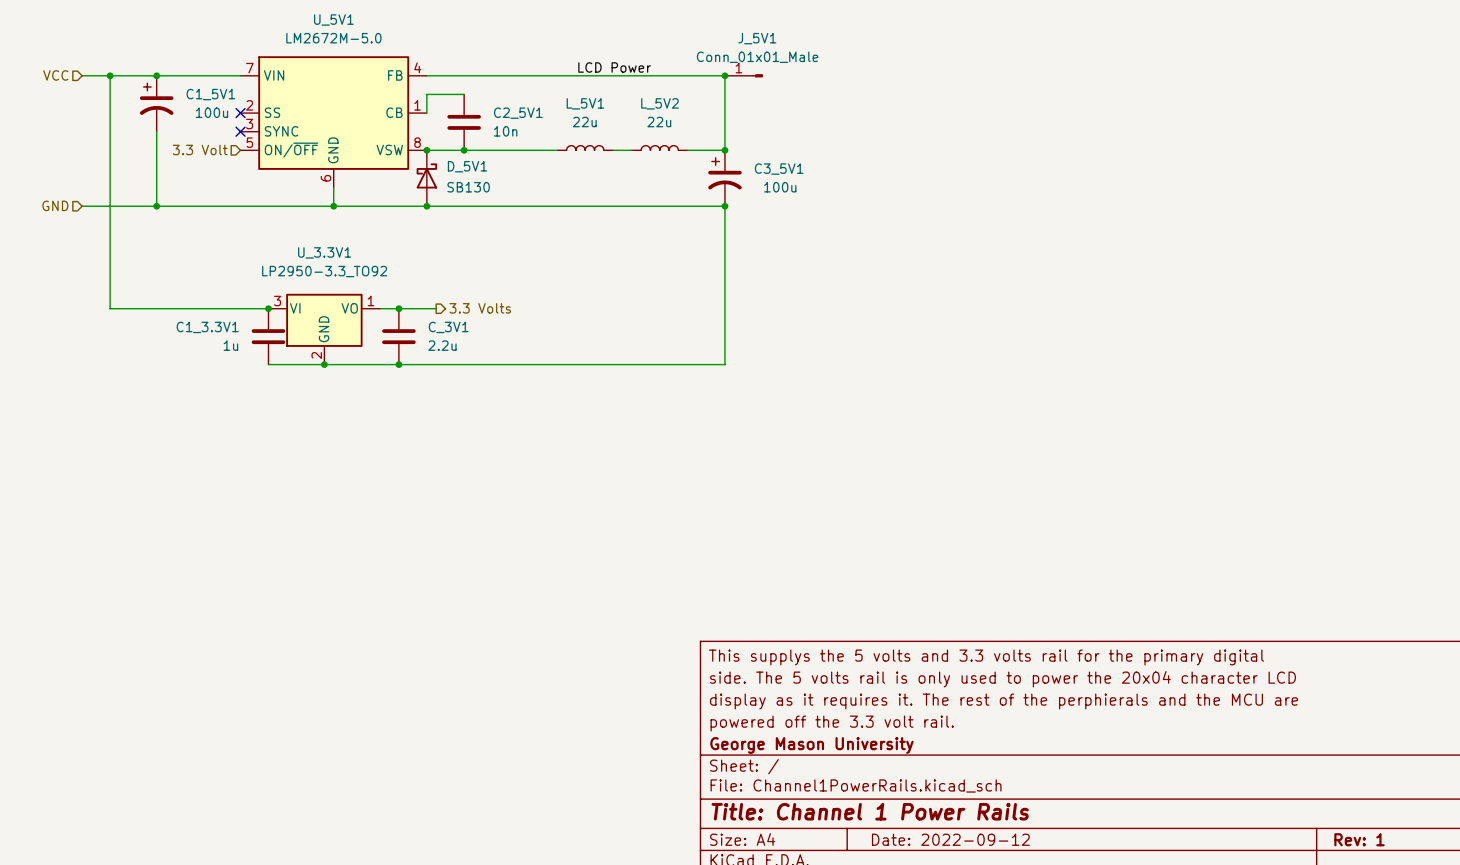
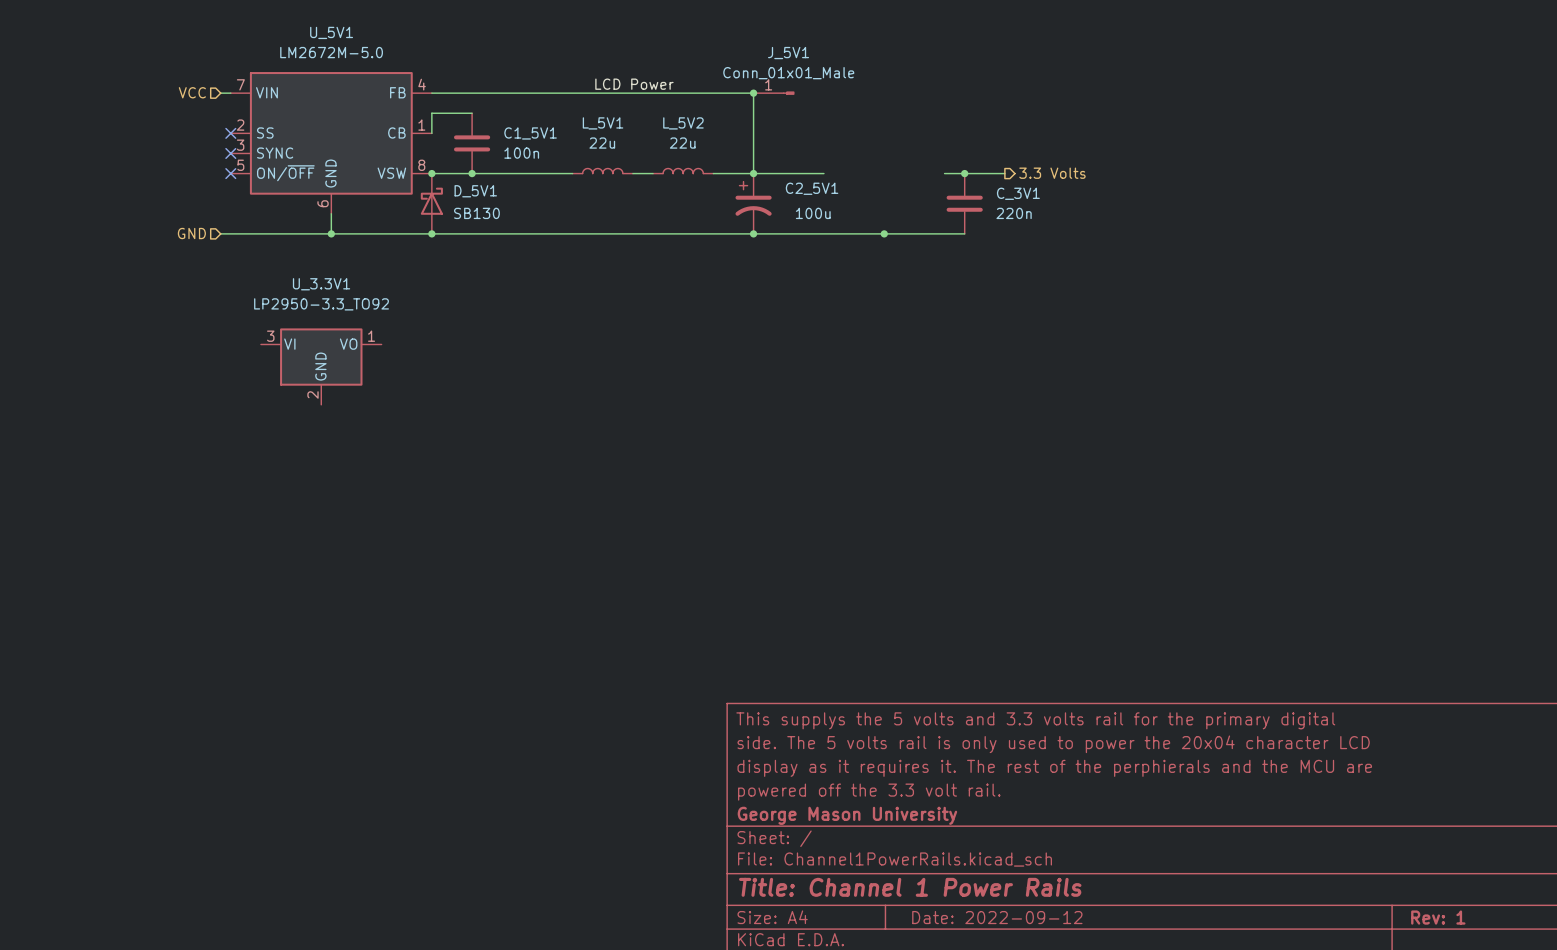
hierarchical label position: VCC (55, 75) -> VCC (192, 92)
wire: (82, 75) (231, 75) -> none
wire: (110, 75) (110, 308) (268, 308) -> none
junction: (110, 75) -> none
junction: (156, 75) -> none
C1_5V1: 100u (156, 103) -> none
C2_5V1 name: C2_5V1 (518, 113) -> C1_5V1 (530, 133)
wire: (156, 131) (156, 206) -> none
C2_5V1 value: 10n (505, 131) -> 100n (521, 153)
hierarchical label: 3.3 Volt (200, 149) -> none
hierarchical label: none -> 3.3 Volts (1052, 173)
no-connect mark: none -> (230, 173)
wire: none -> (753, 173) (823, 173)
wire: none -> (944, 173) (1004, 173)
junction: none -> (964, 173)
C3_5V1 name: C3_5V1 (779, 169) -> C2_5V1 (812, 188)
hierarchical label position: GND (55, 205) -> GND (191, 233)
wire: (82, 206) (231, 206) -> none
junction: (156, 206) -> none
wire: (724, 206) (724, 364) (268, 364) -> (753, 233) (964, 233)
junction: none -> (884, 233)
junction: (268, 308) -> none
wire: (380, 308) (436, 308) -> none
junction: (398, 308) -> none
hierarchical label: 3.3 Volts (480, 308) -> none
C1_3.3V1: 1u (268, 336) -> none
C_3V1 position: (398, 336) -> (964, 203)
C_3V1 value: 2.2u (442, 345) -> 220n (1014, 213)
junction: (324, 364) -> none
junction: (398, 364) -> none

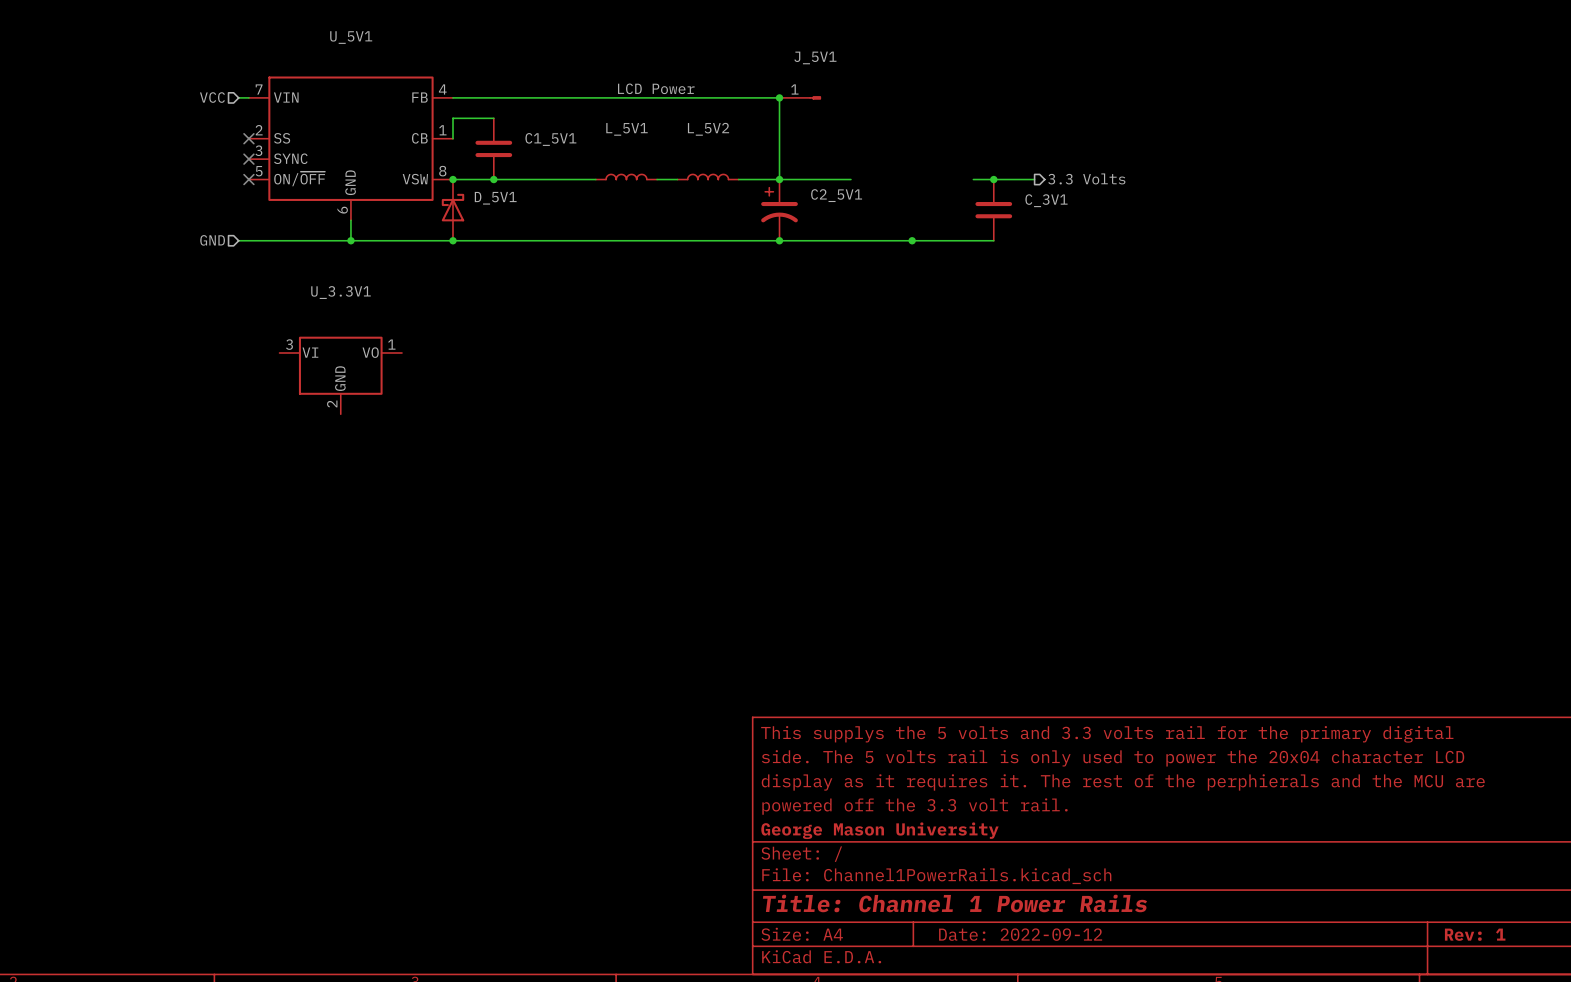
U_5V1 value: LM2672M-5.0 (331, 52) -> none
J_5V1 value: Conn_01x01_Male (788, 73) -> none
L_5V1 value: 22u (602, 143) -> none
L_5V2 value: 22u (682, 143) -> none
C1_5V1 value: 100n (521, 153) -> none
D_5V1 value: SB130 (476, 213) -> none
C2_5V1 value: 100u (813, 213) -> none
C_3V1 value: 220n (1014, 213) -> none
U_3.3V1 value: LP2950-3.3_TO92 (321, 304) -> none

